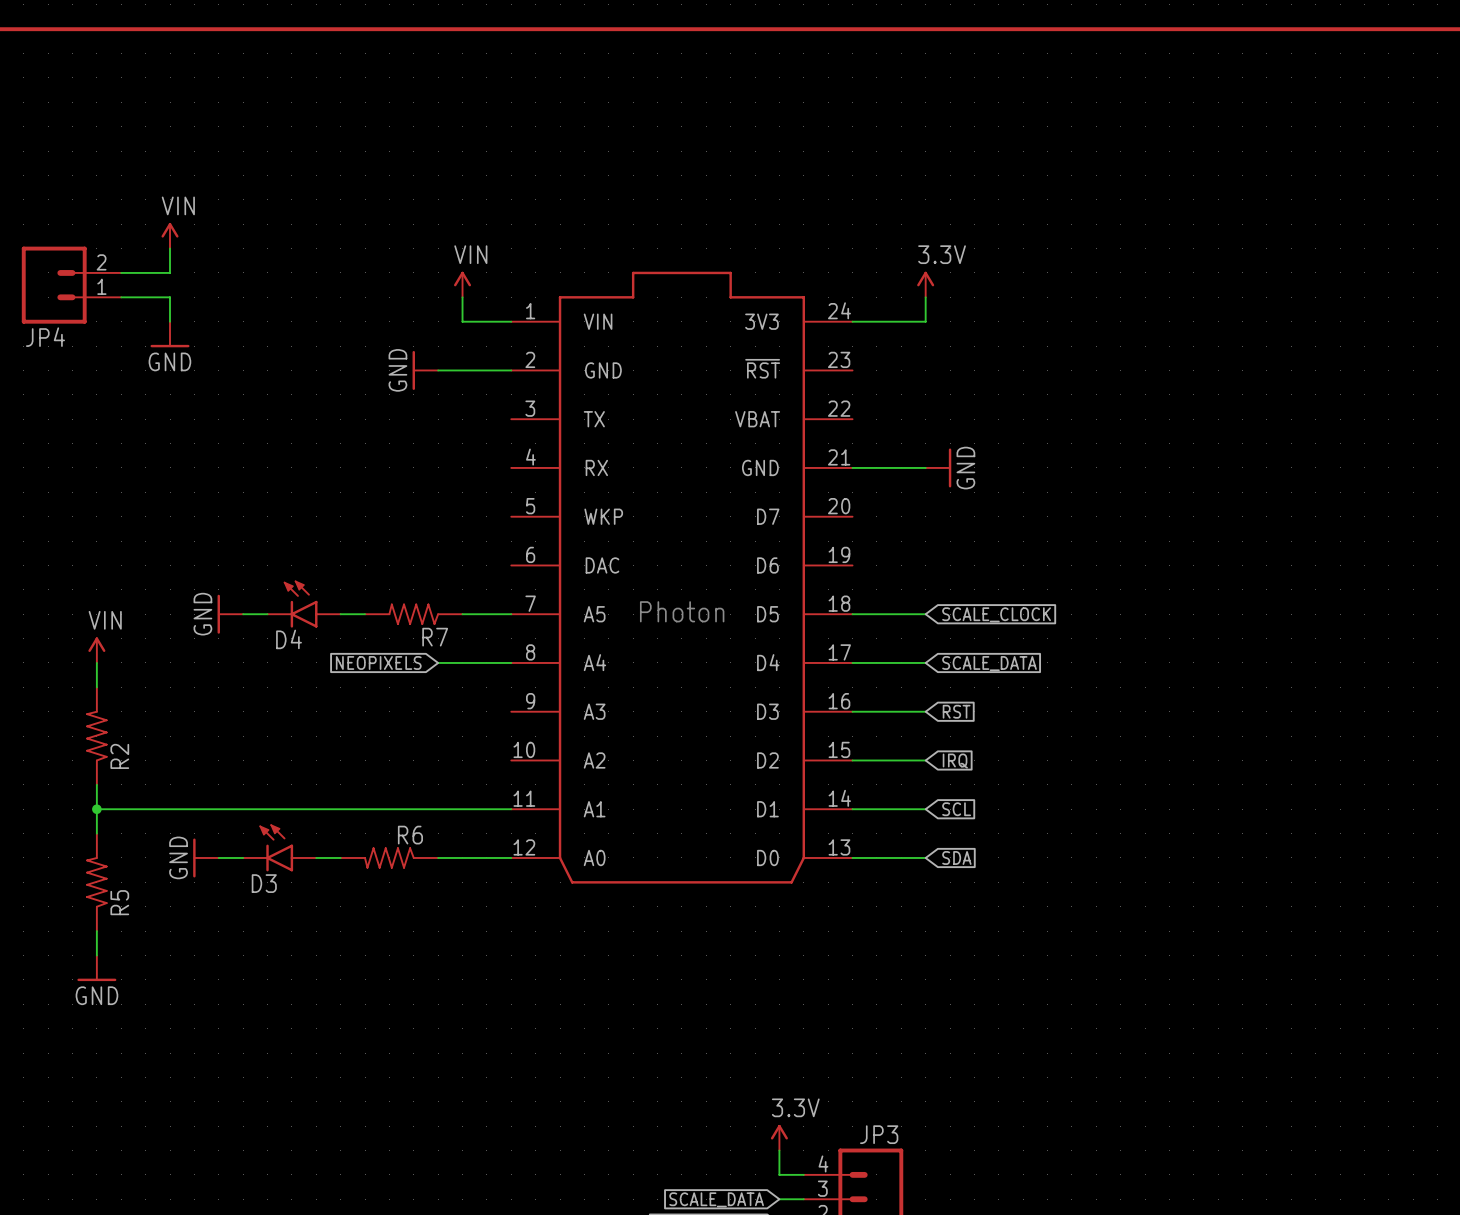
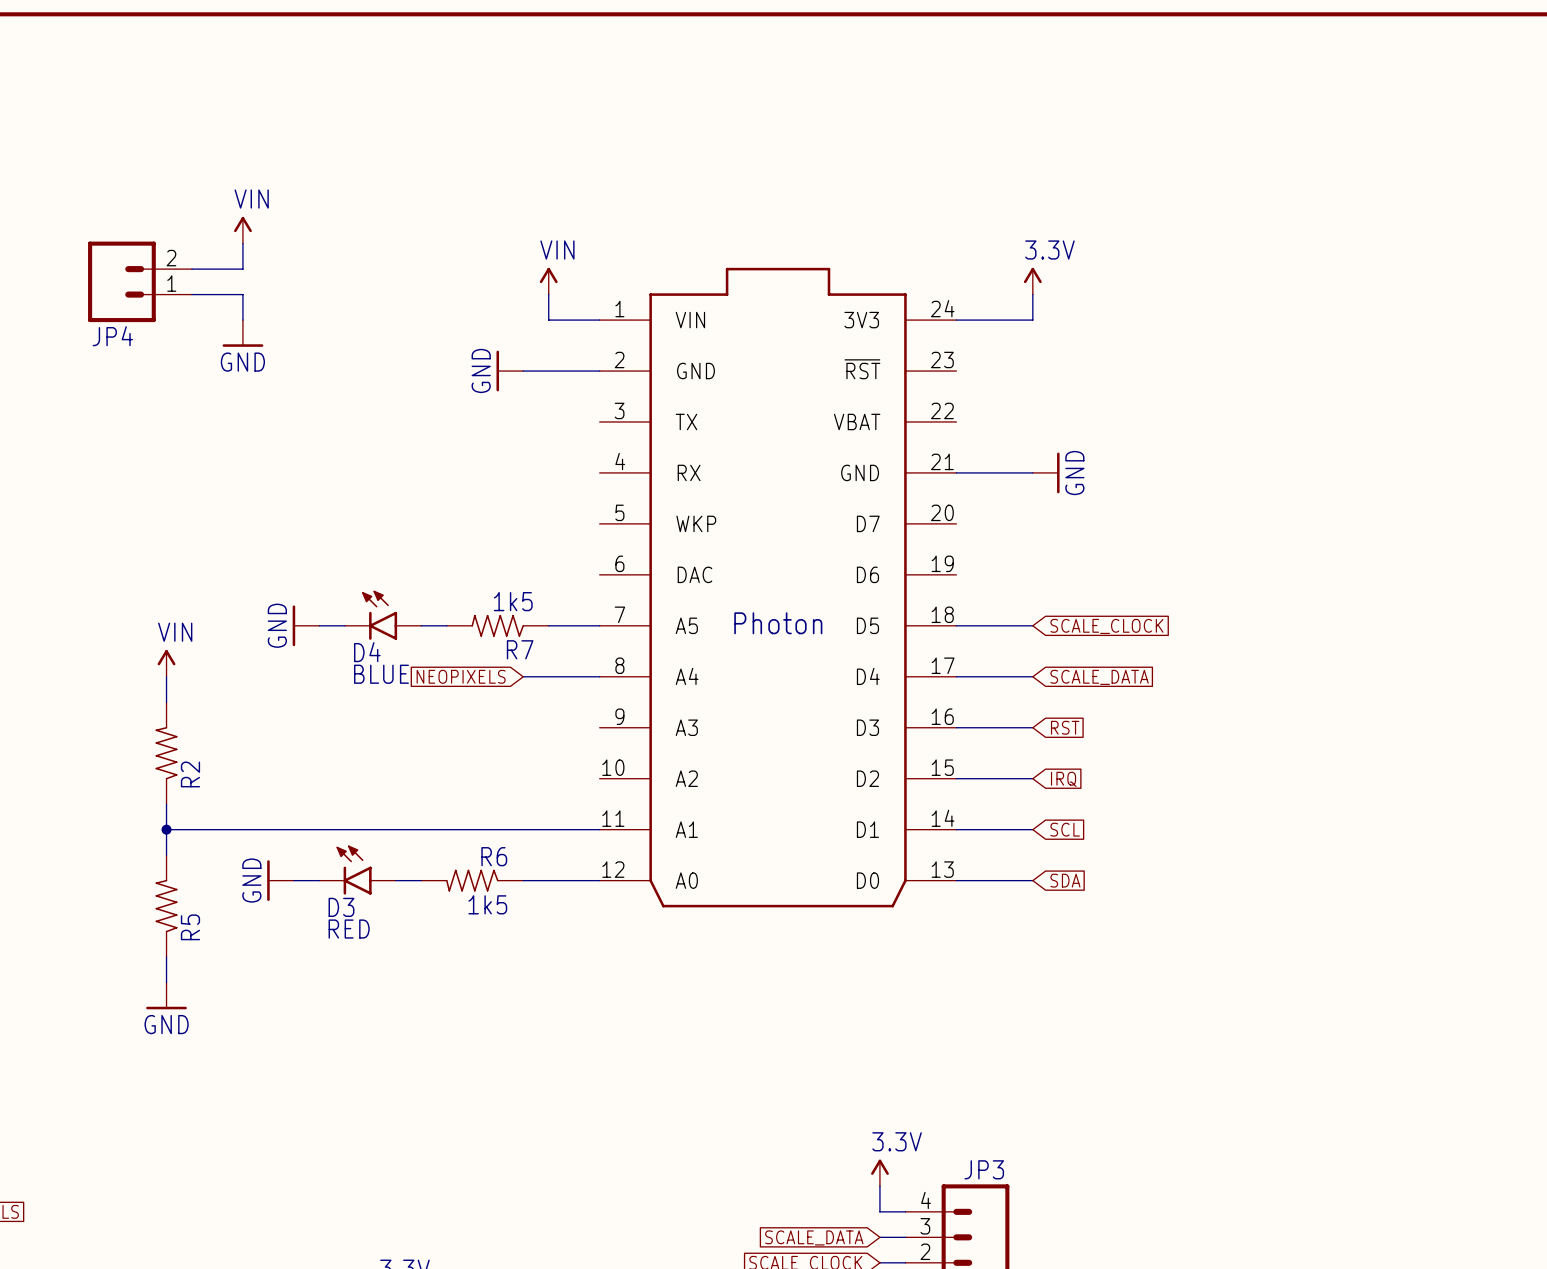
R7 value: none -> 1k5 (513, 601)
D4 value: none -> BLUE (381, 674)
R6 value: none -> 1k5 (487, 904)
D3 value: none -> RED (349, 929)

